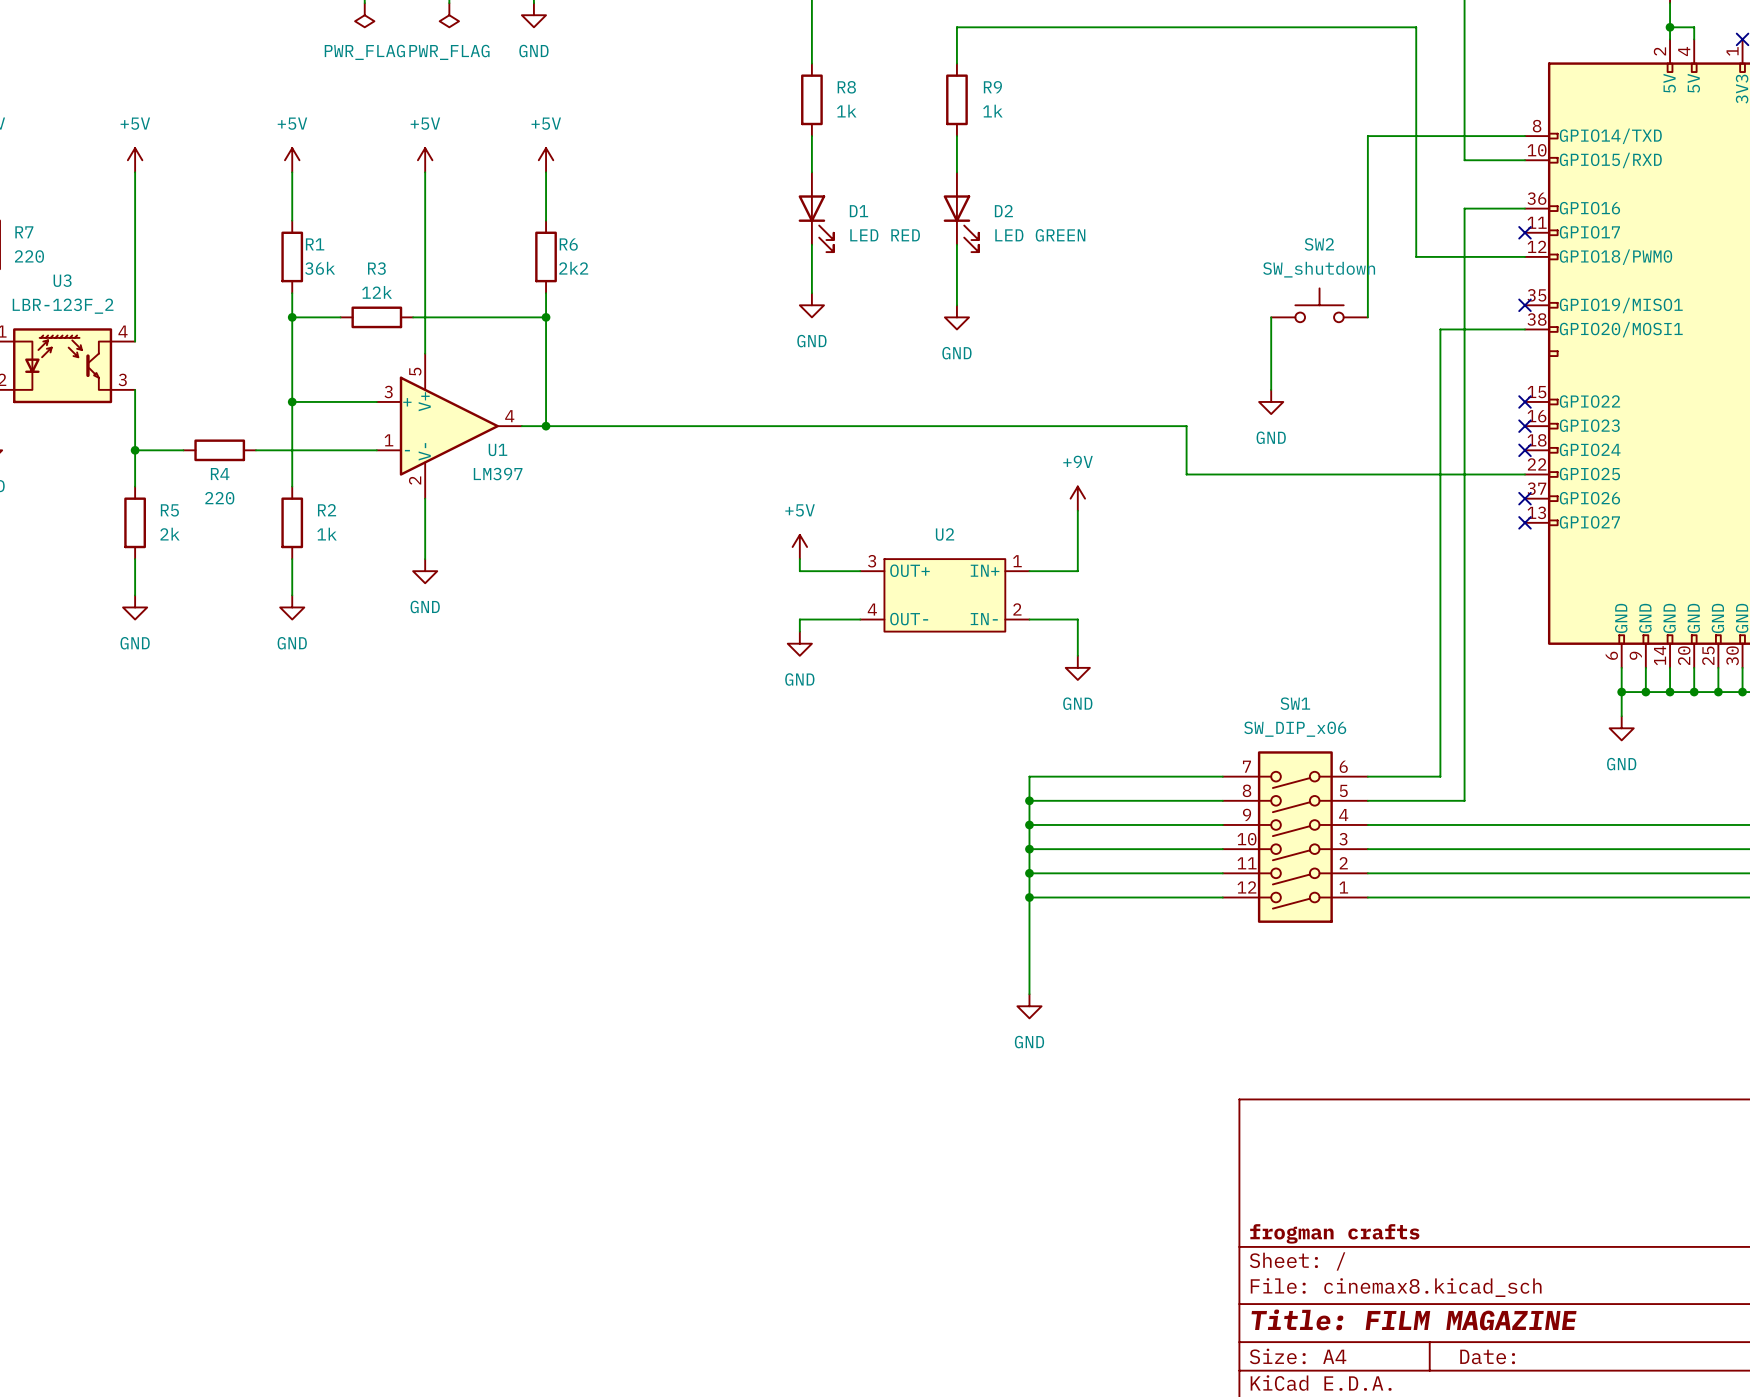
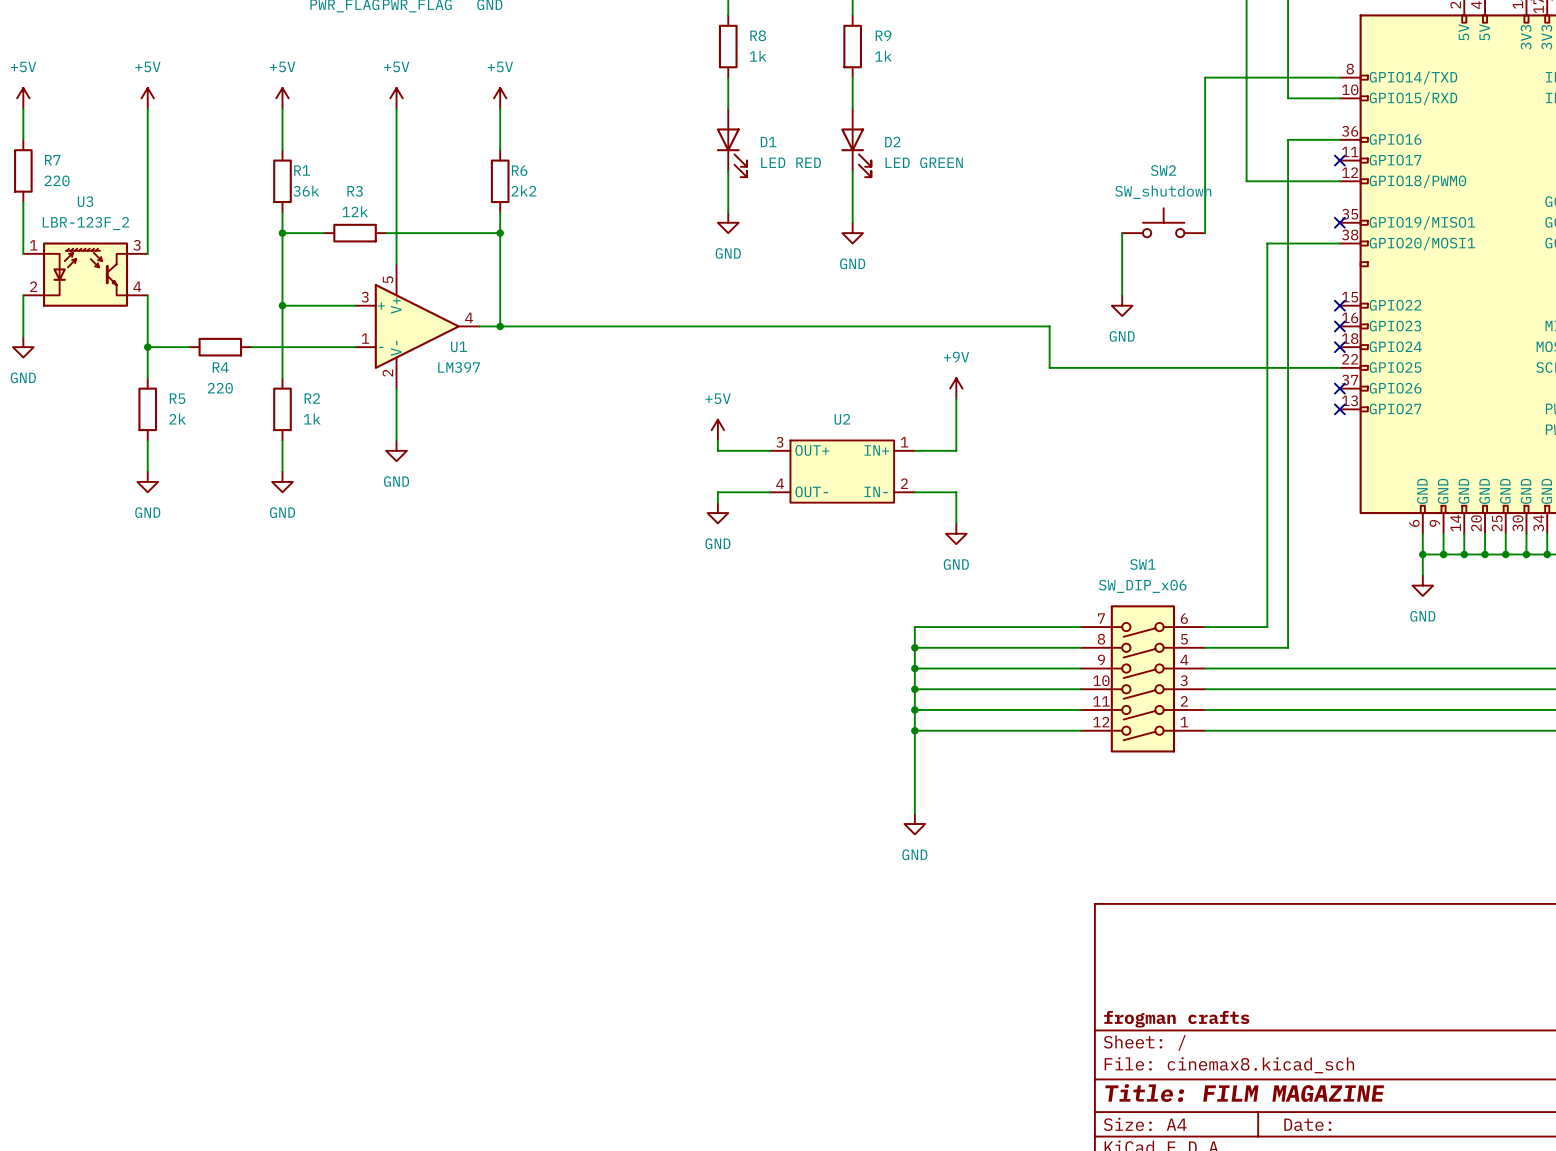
U3 pin number: 4 (122, 331) -> 3 (137, 245)
U3 pin number: 3 (122, 379) -> 4 (137, 286)

